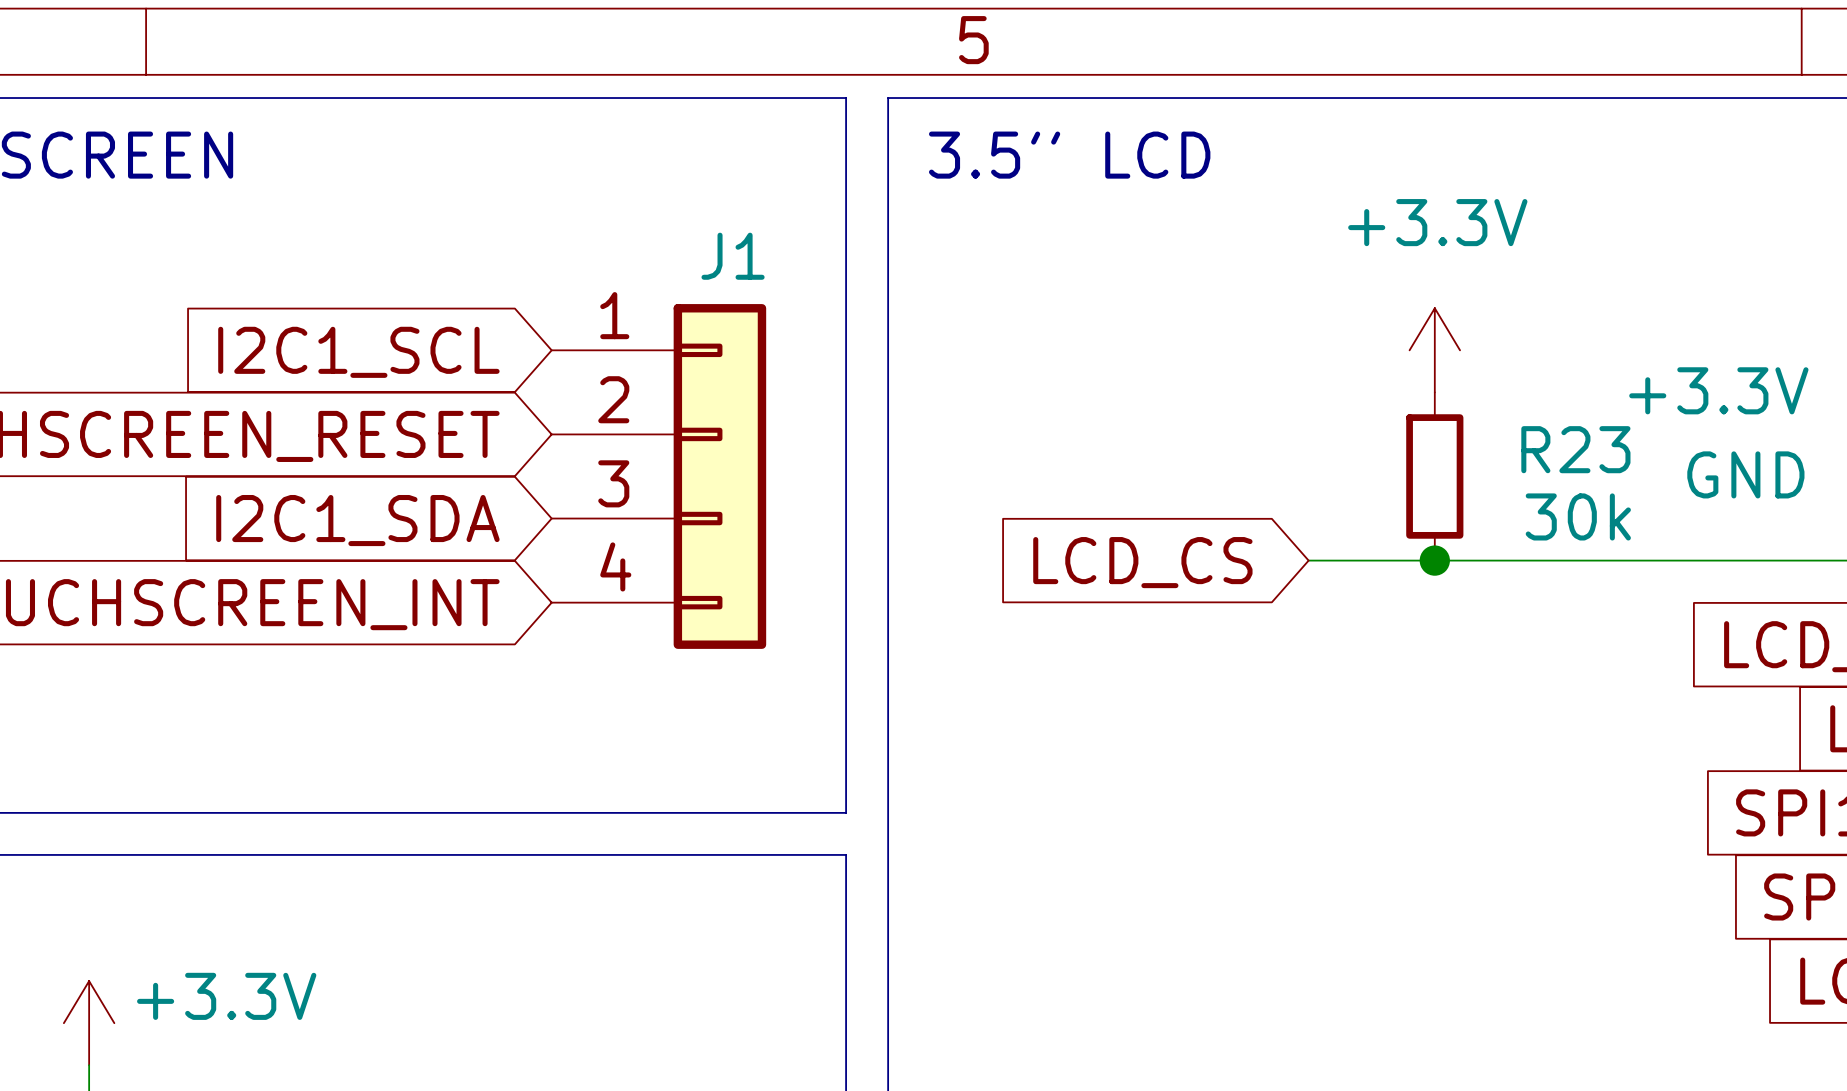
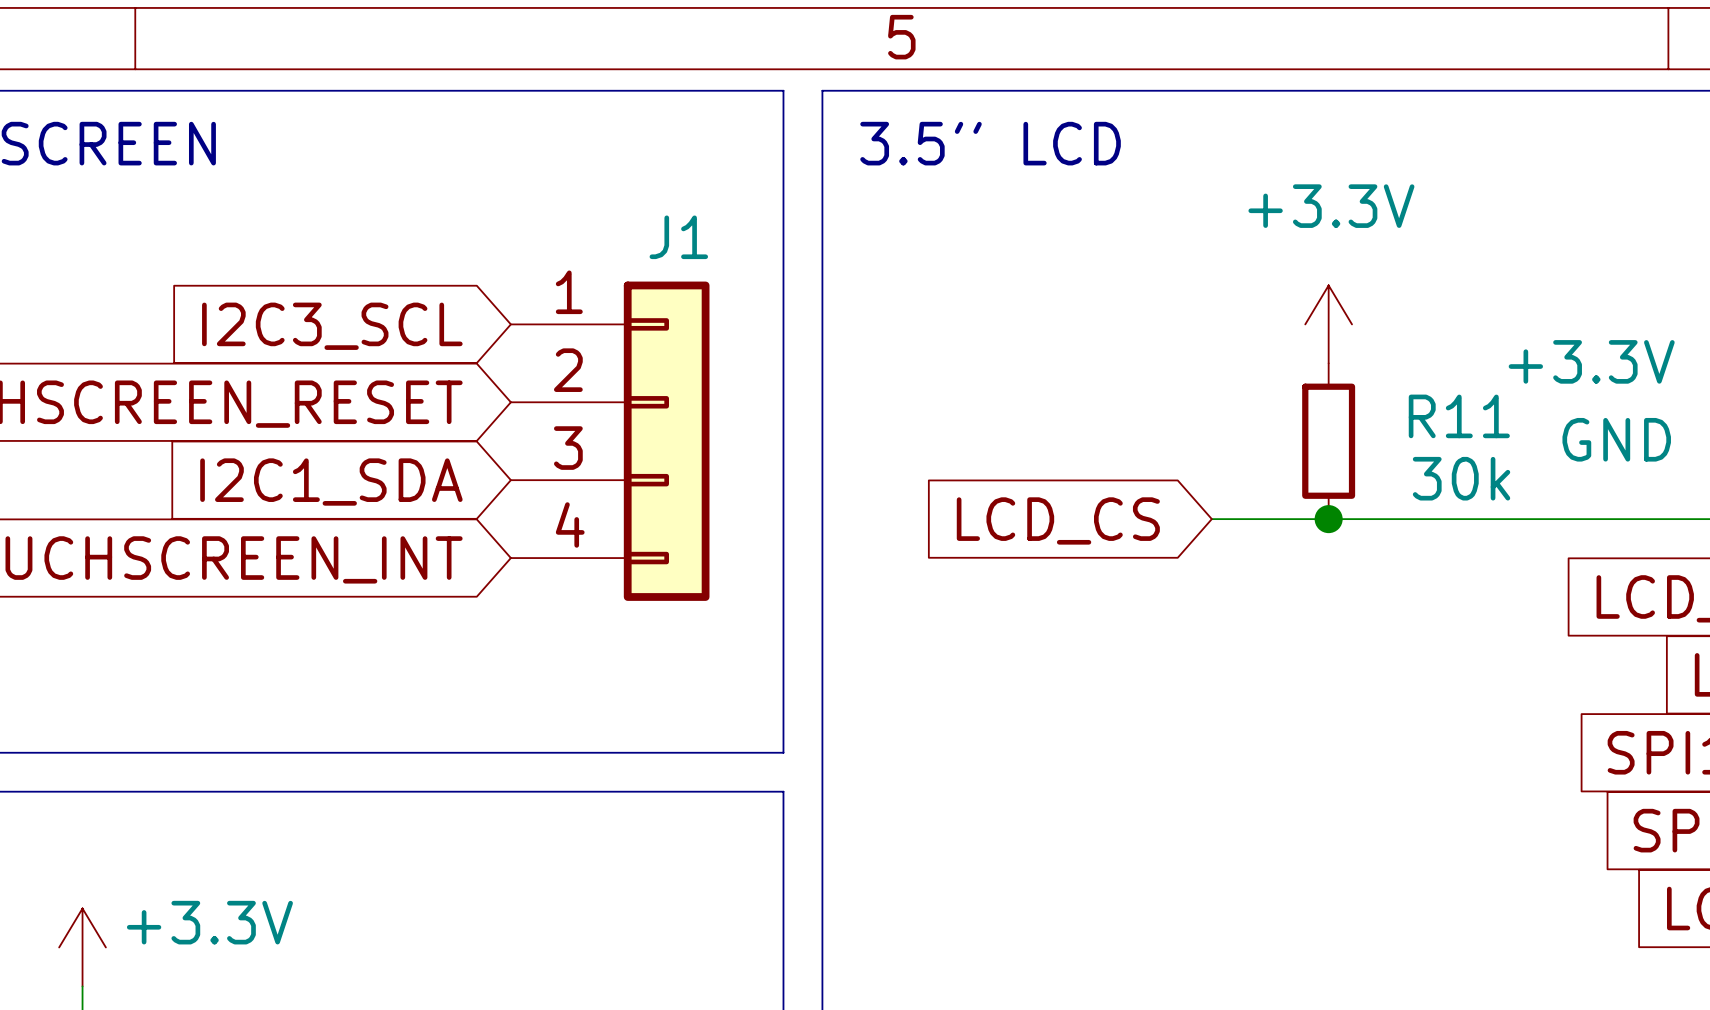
global label: I2C1_SCL (358, 352) -> I2C3_SCL (332, 326)
R23 name: R23 (1575, 449) -> R11 (1459, 416)

